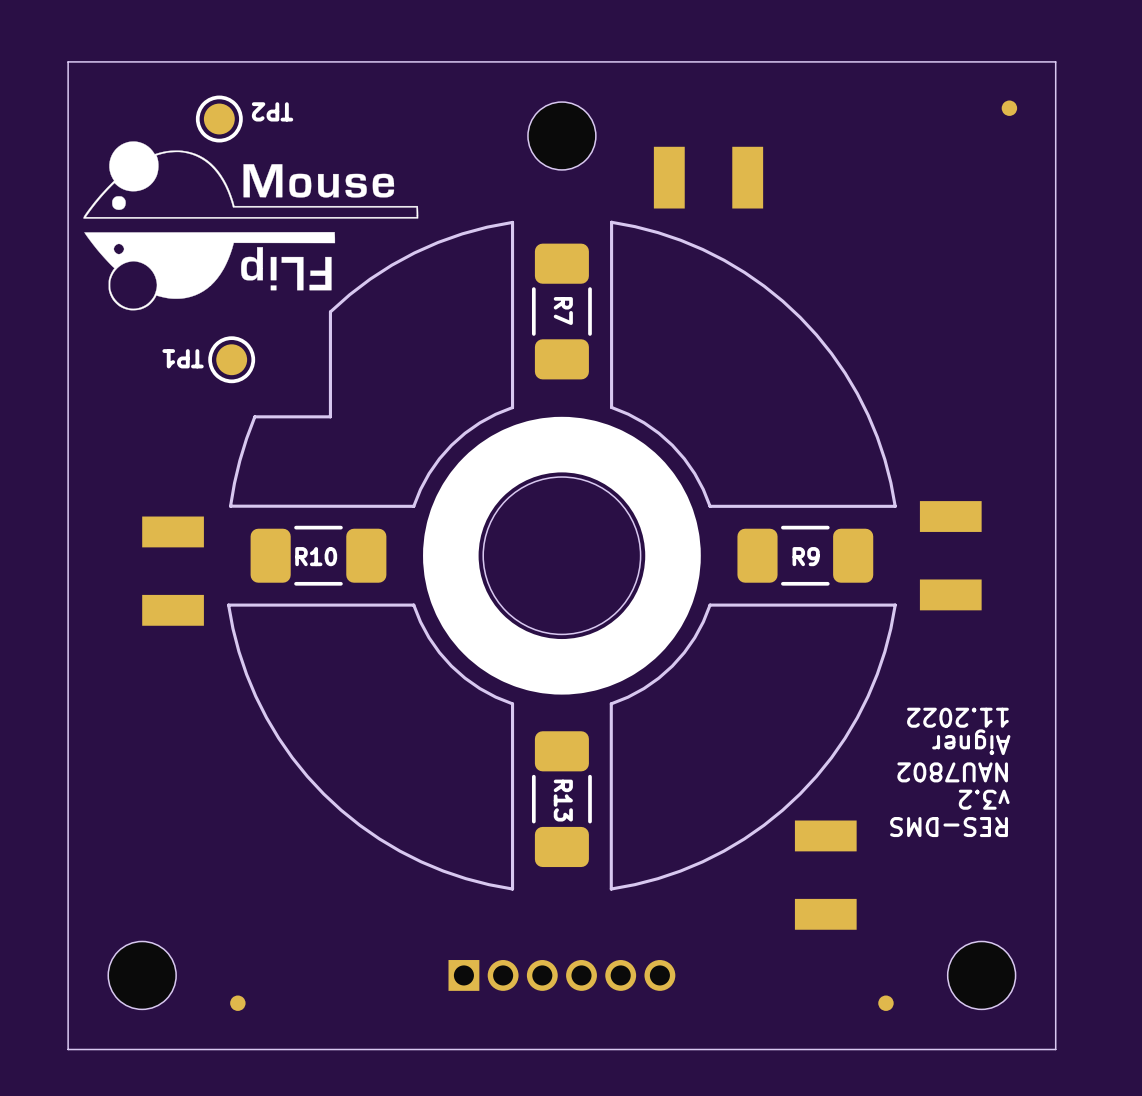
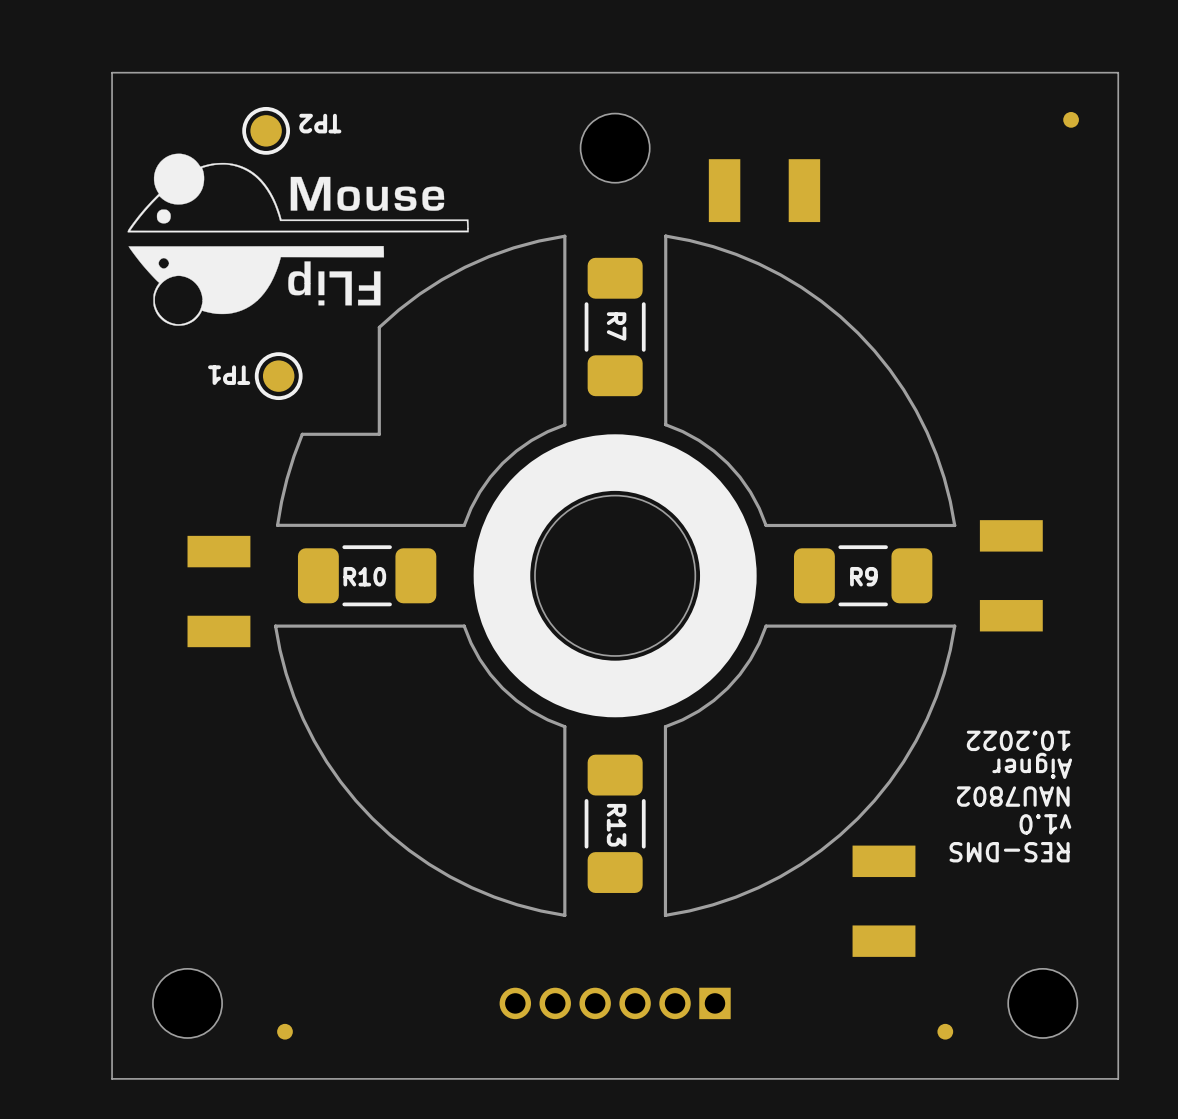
text: 11.2022 (957, 717) -> 10.2022 (1018, 740)
text: v3.2 (984, 799) -> v1.0 (1045, 824)
part rotation: 0° (561, 975) -> 180° (615, 1003)

